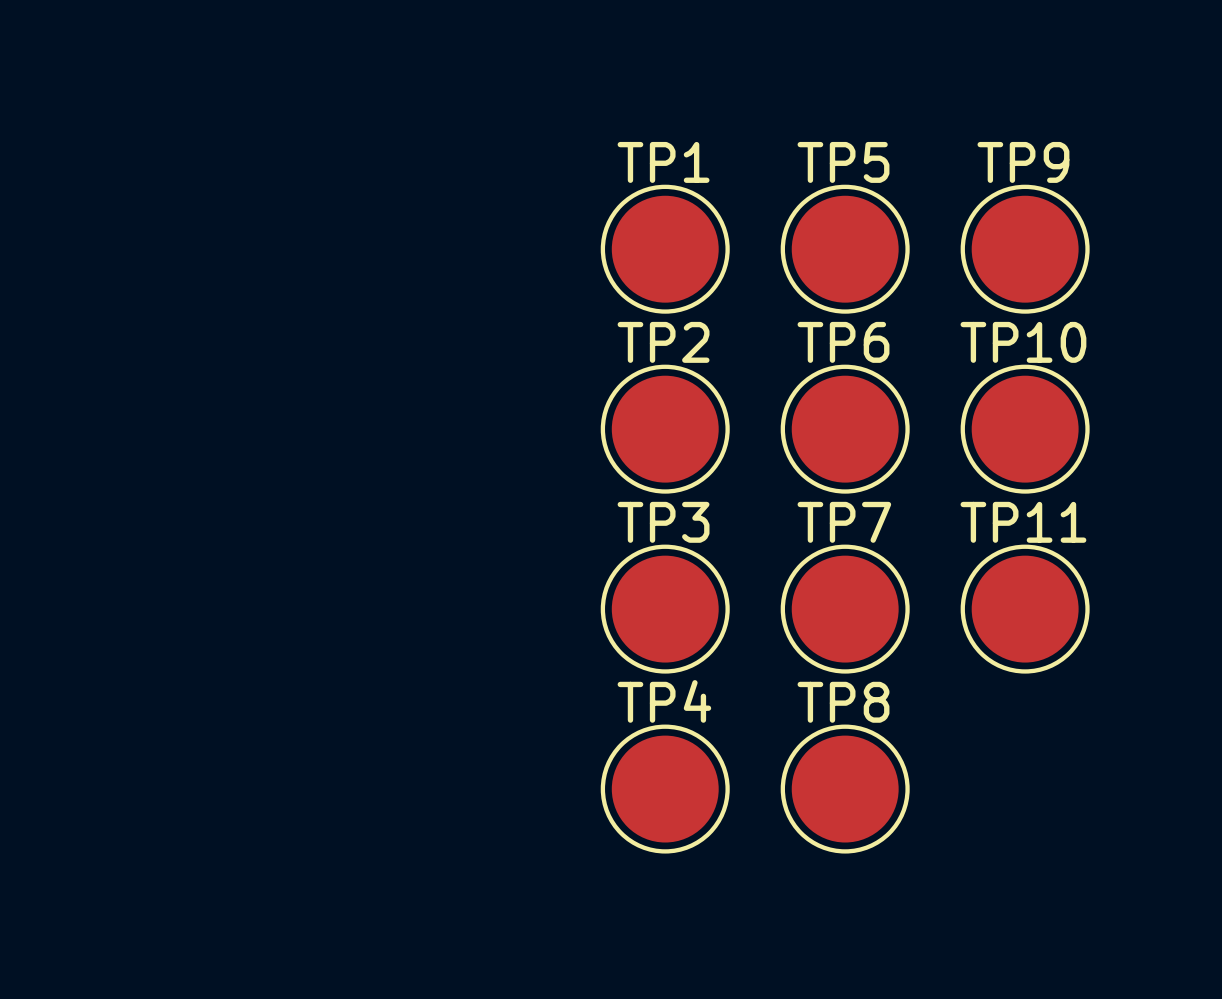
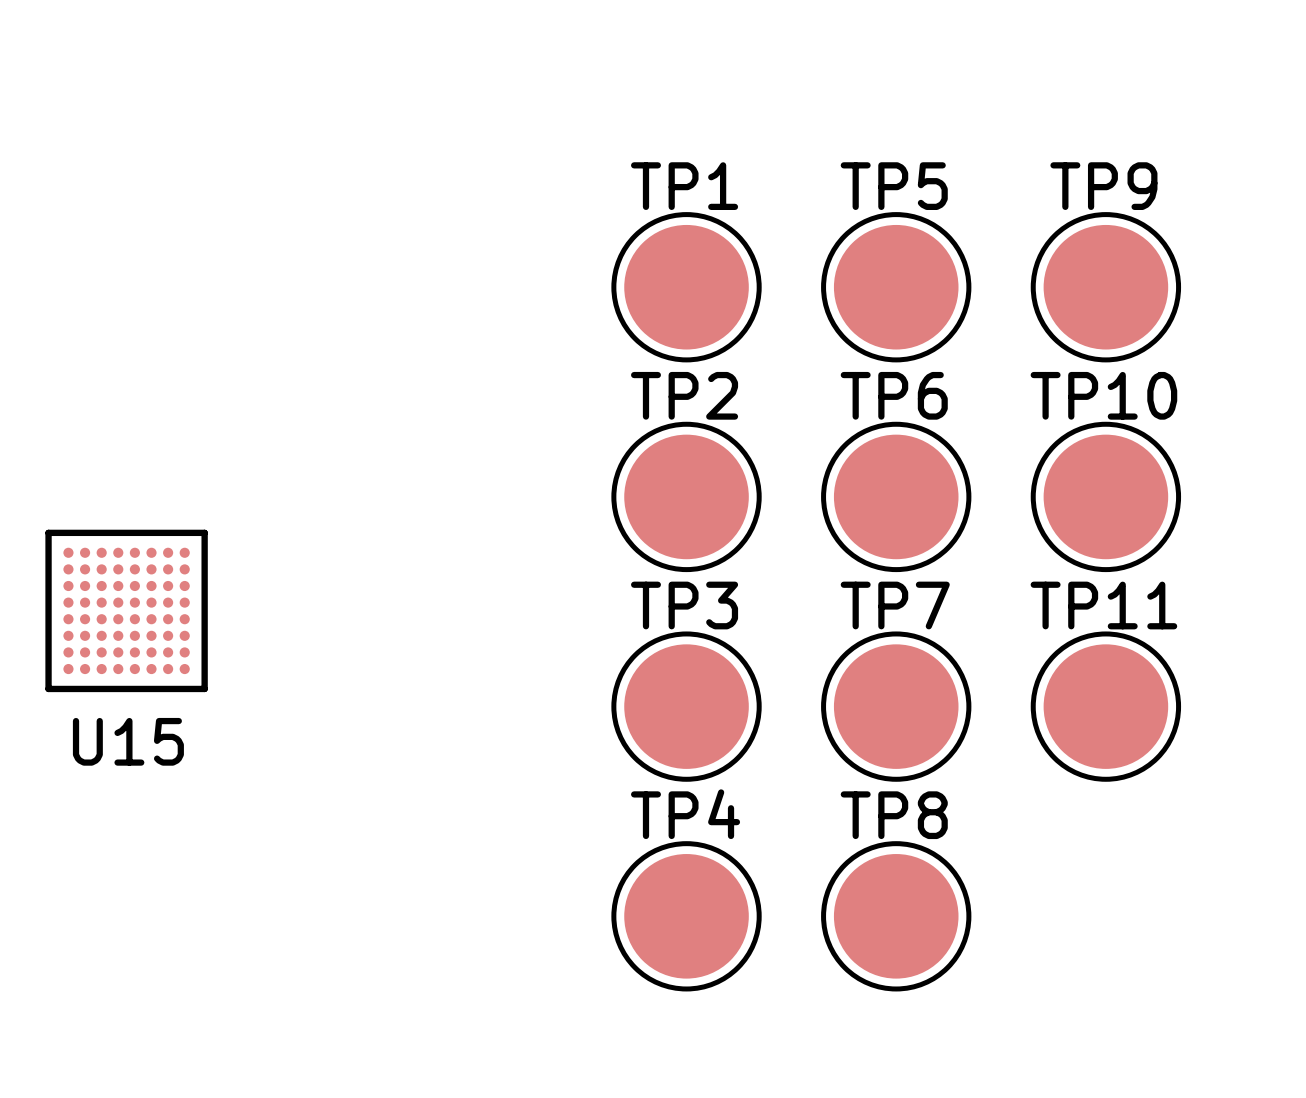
U15: none -> (126, 610)

